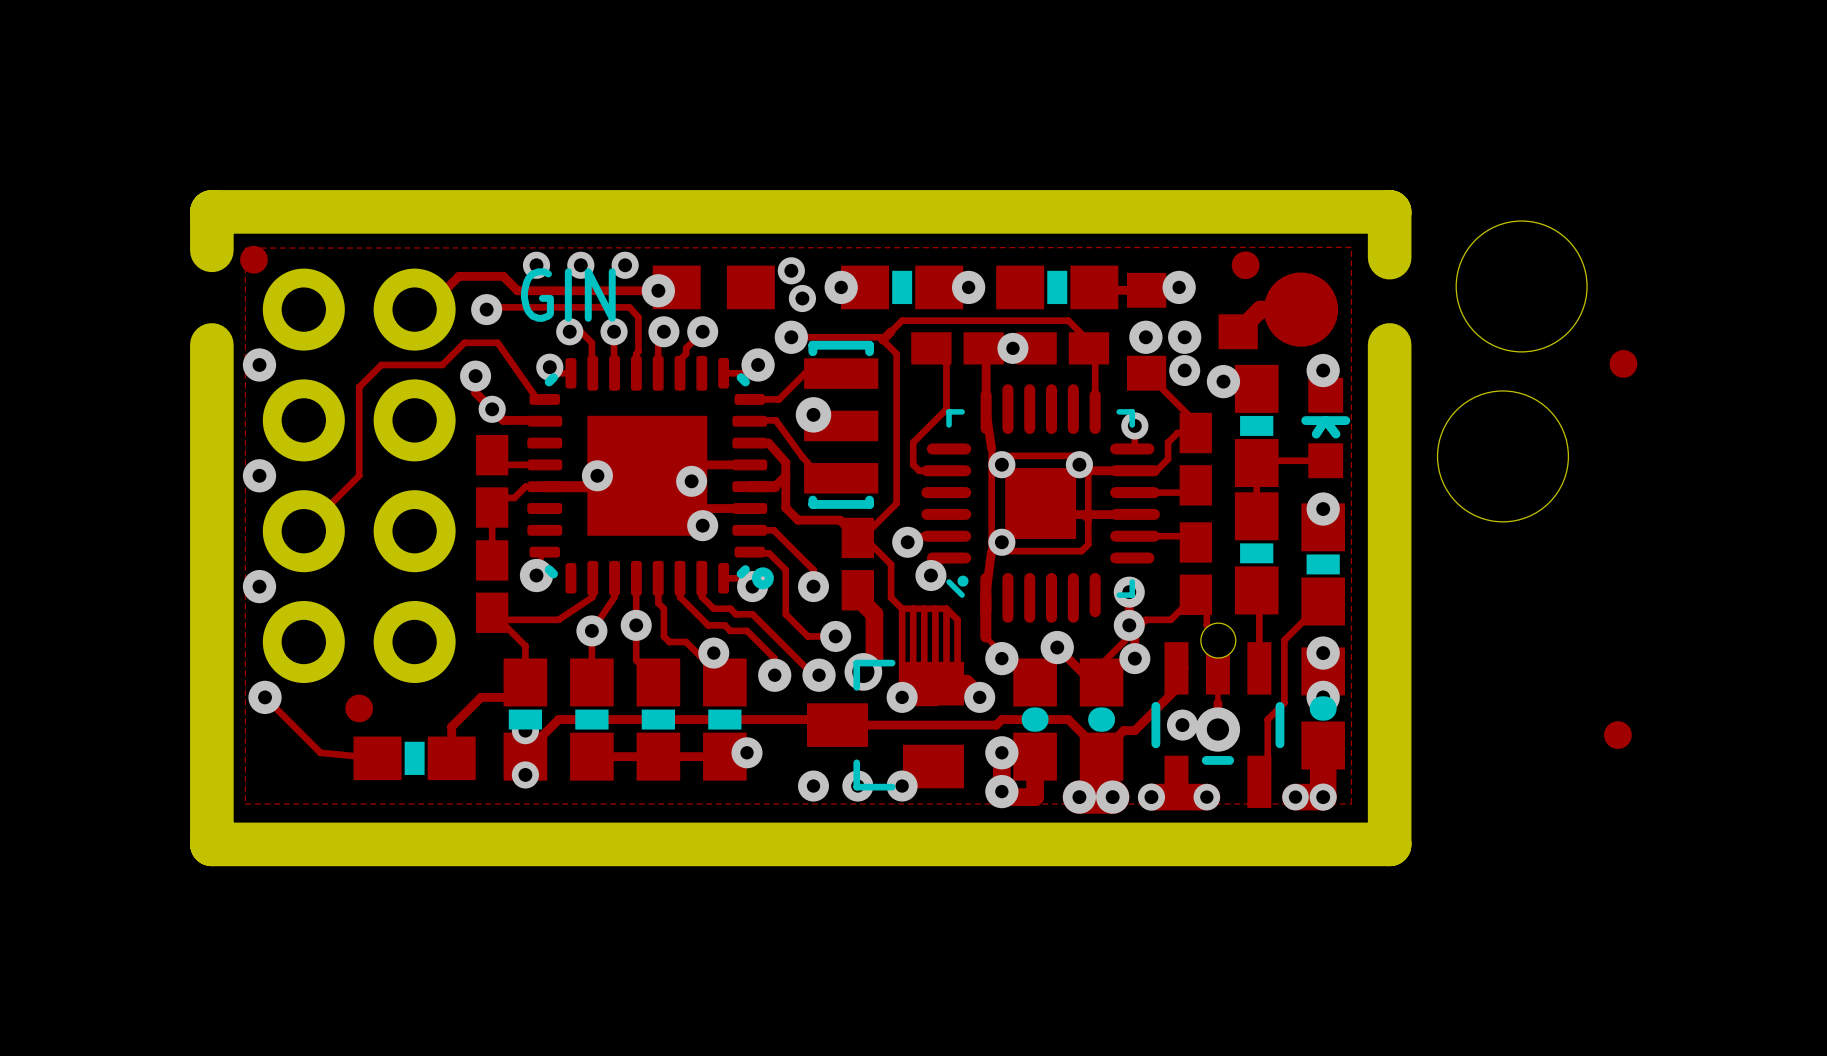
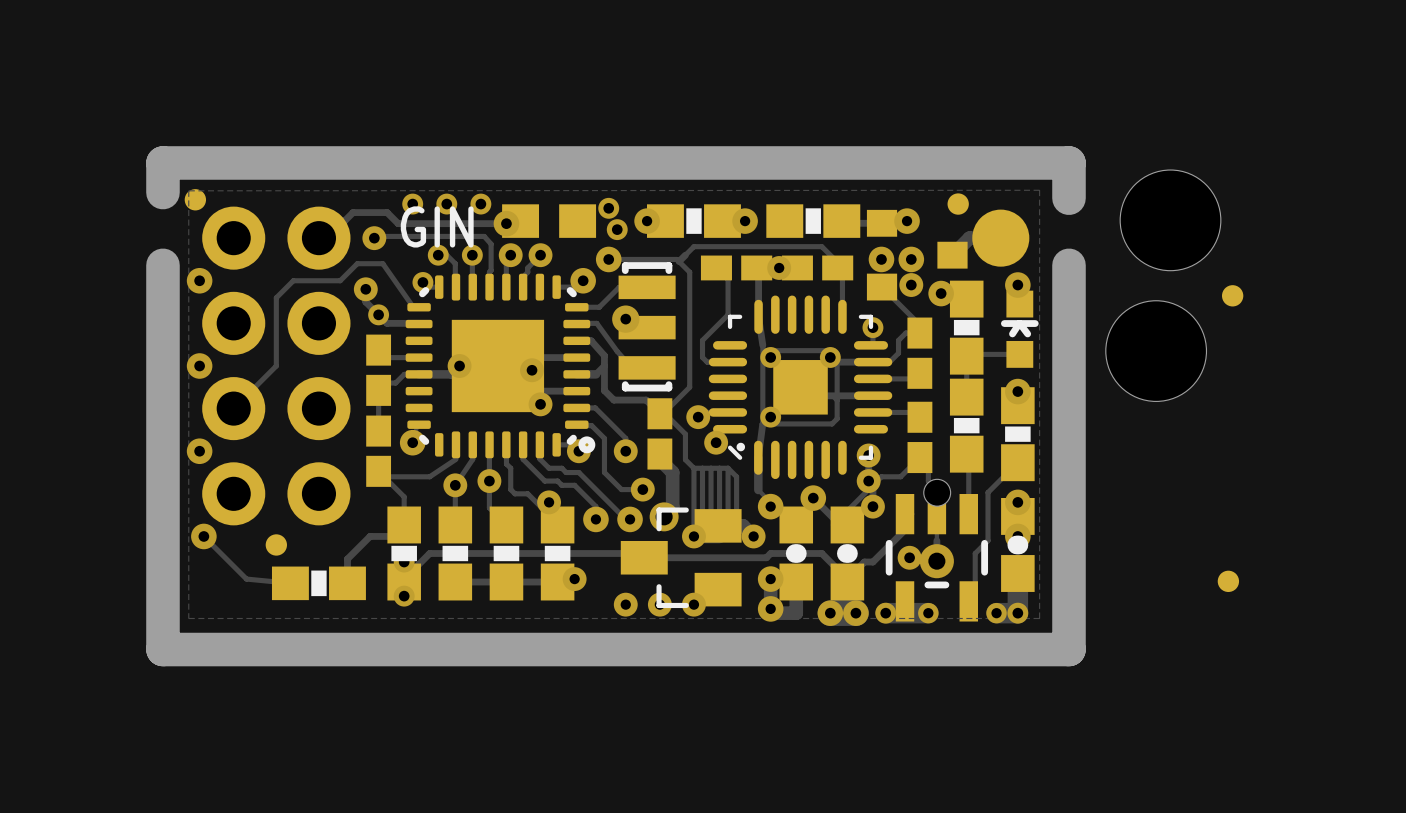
part position: (1623, 363) -> (1232, 295)
part position: (1617, 735) -> (1228, 581)

